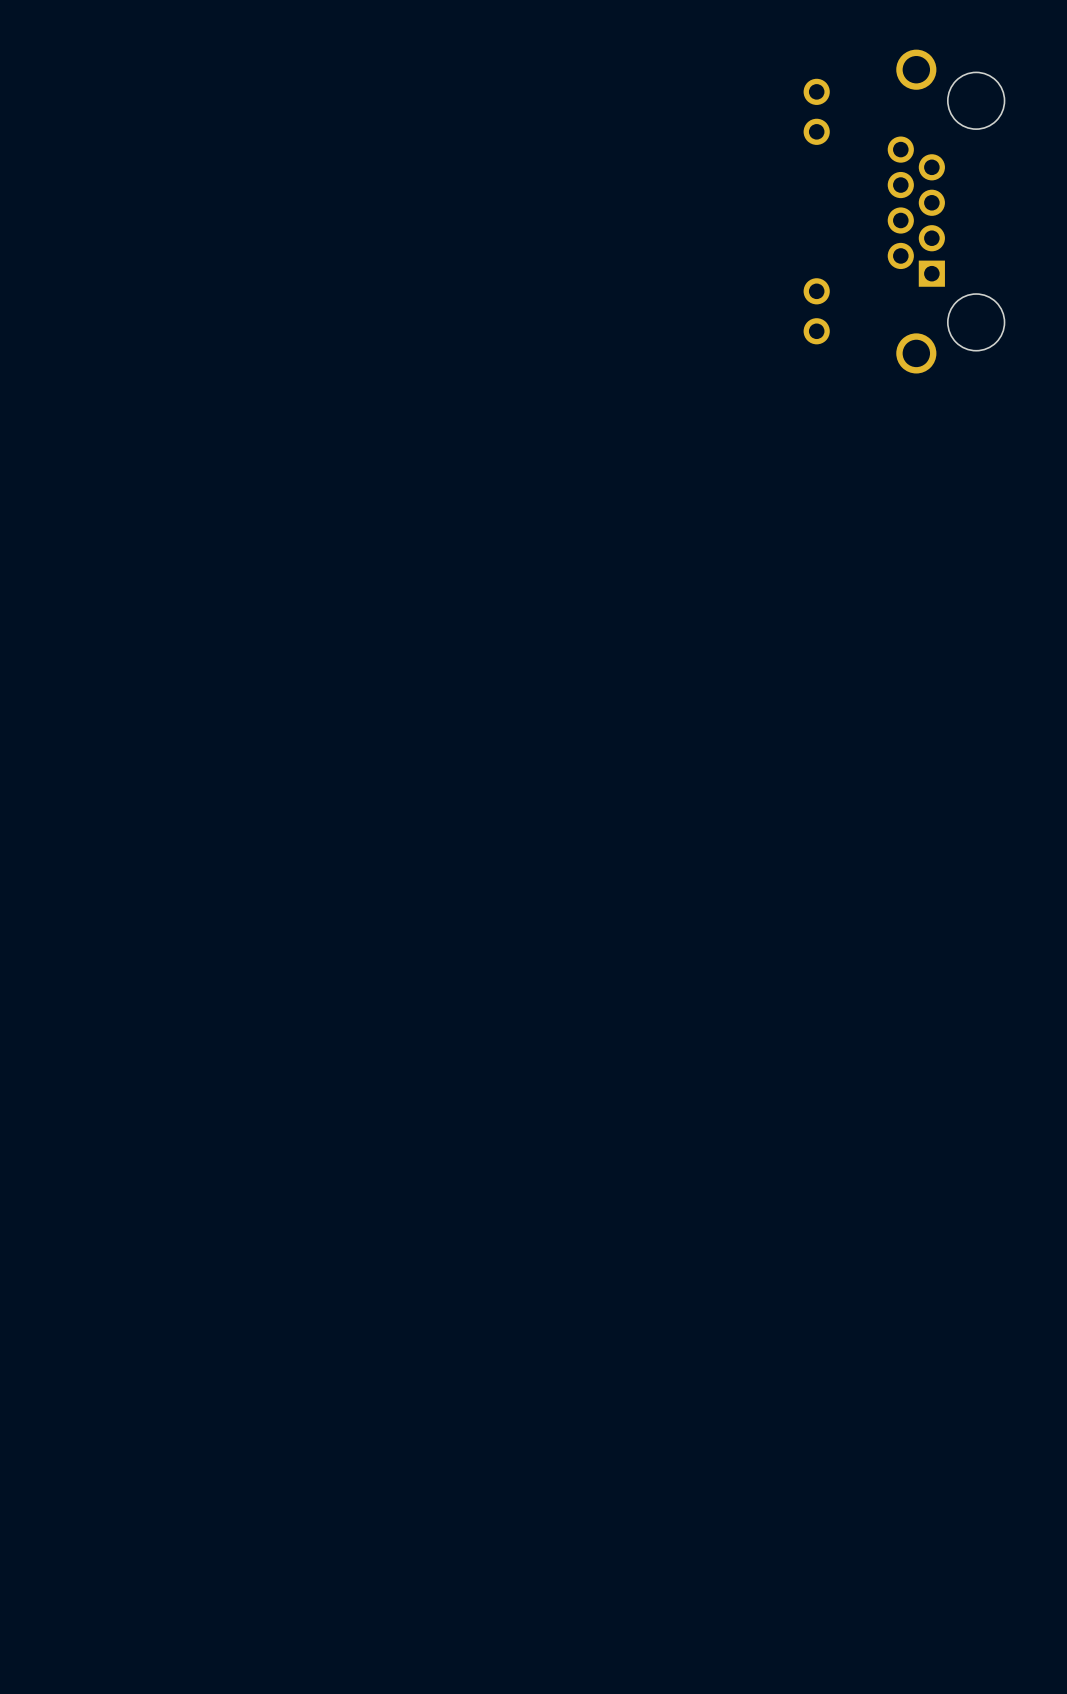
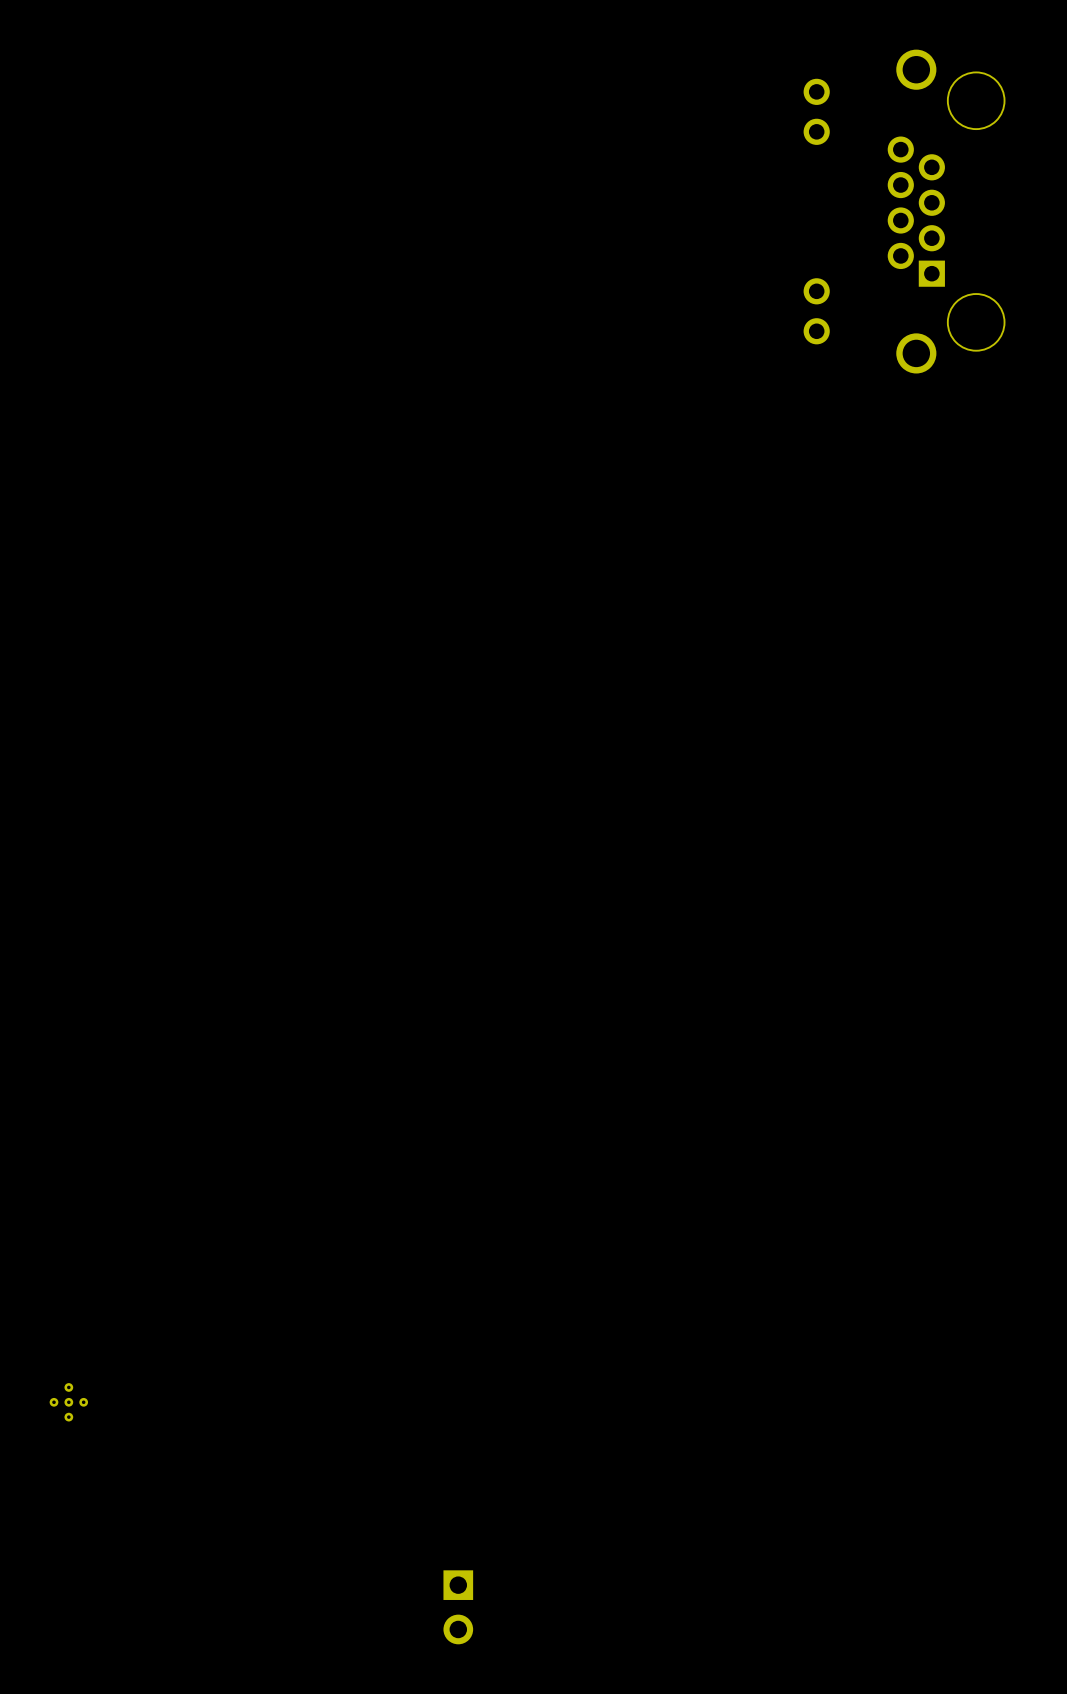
part: none -> (68, 1402)
part: none -> (458, 1607)

